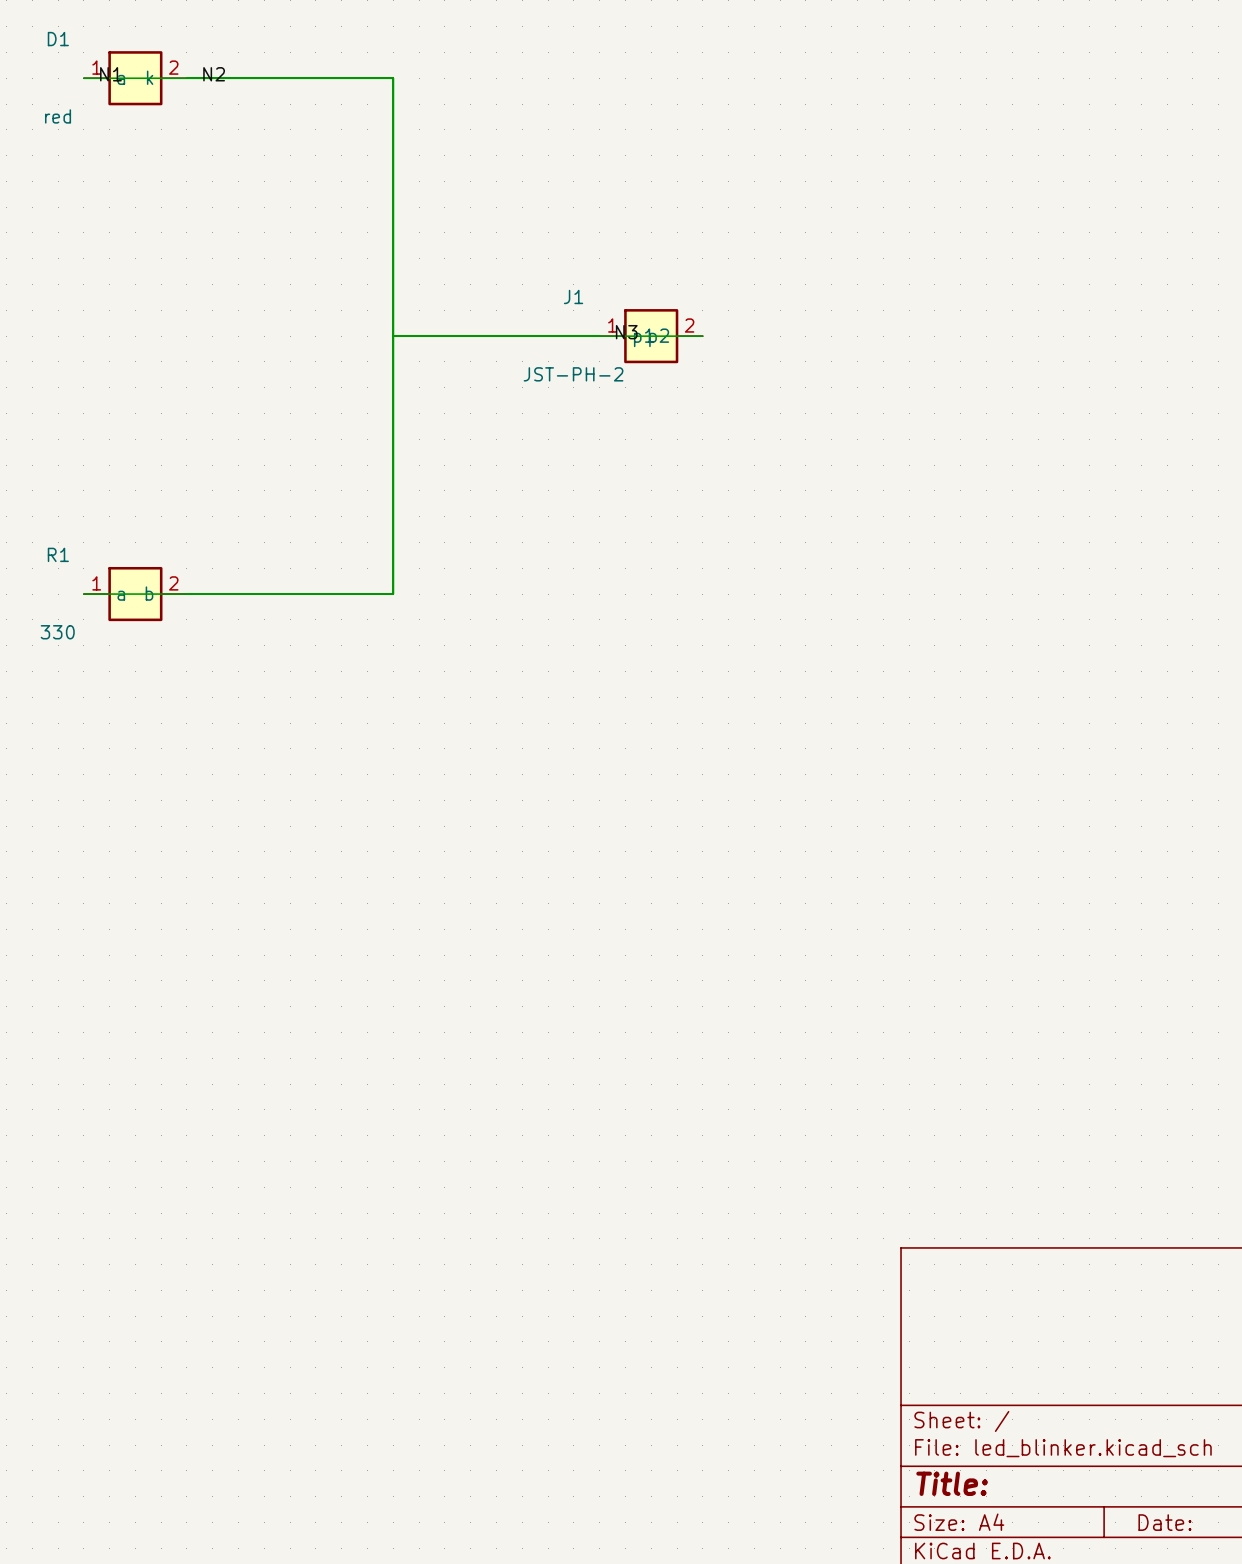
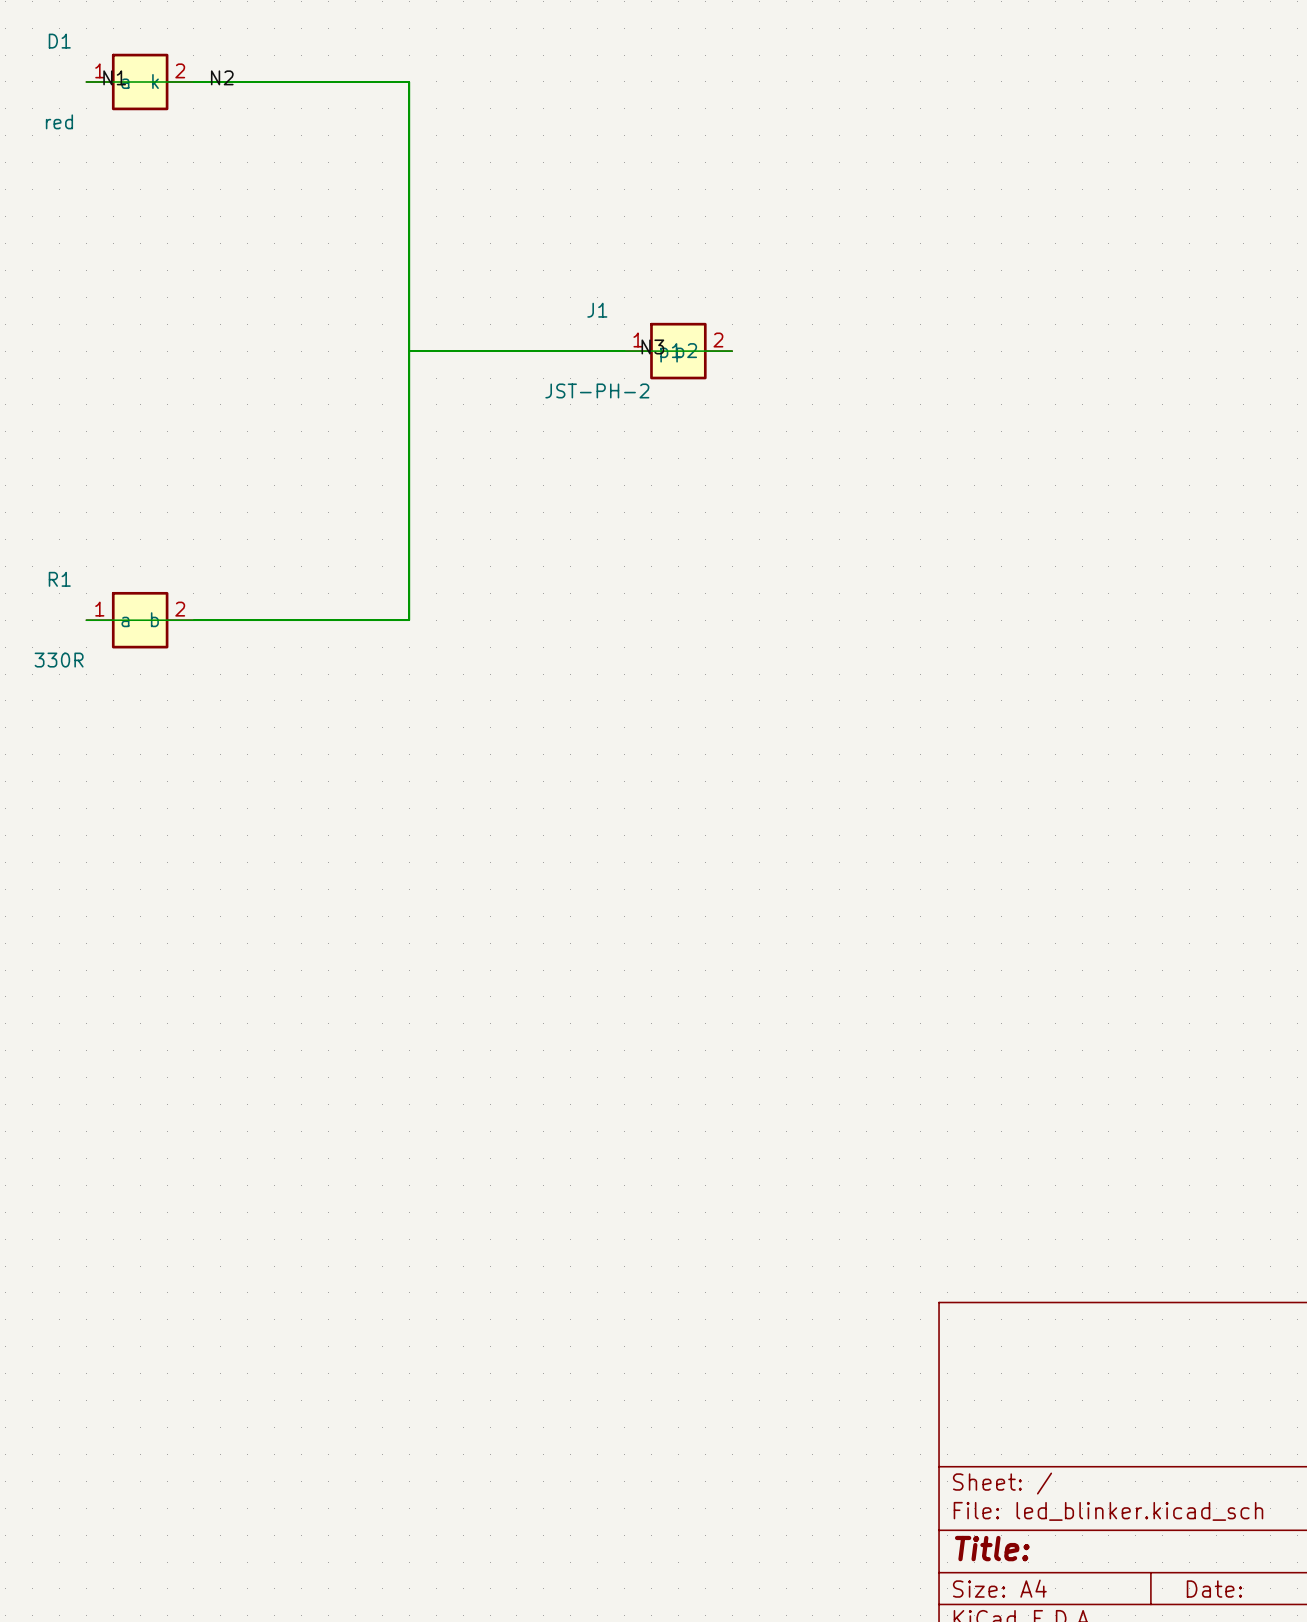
R1 value: 330 (57, 632) -> 330R (59, 660)

